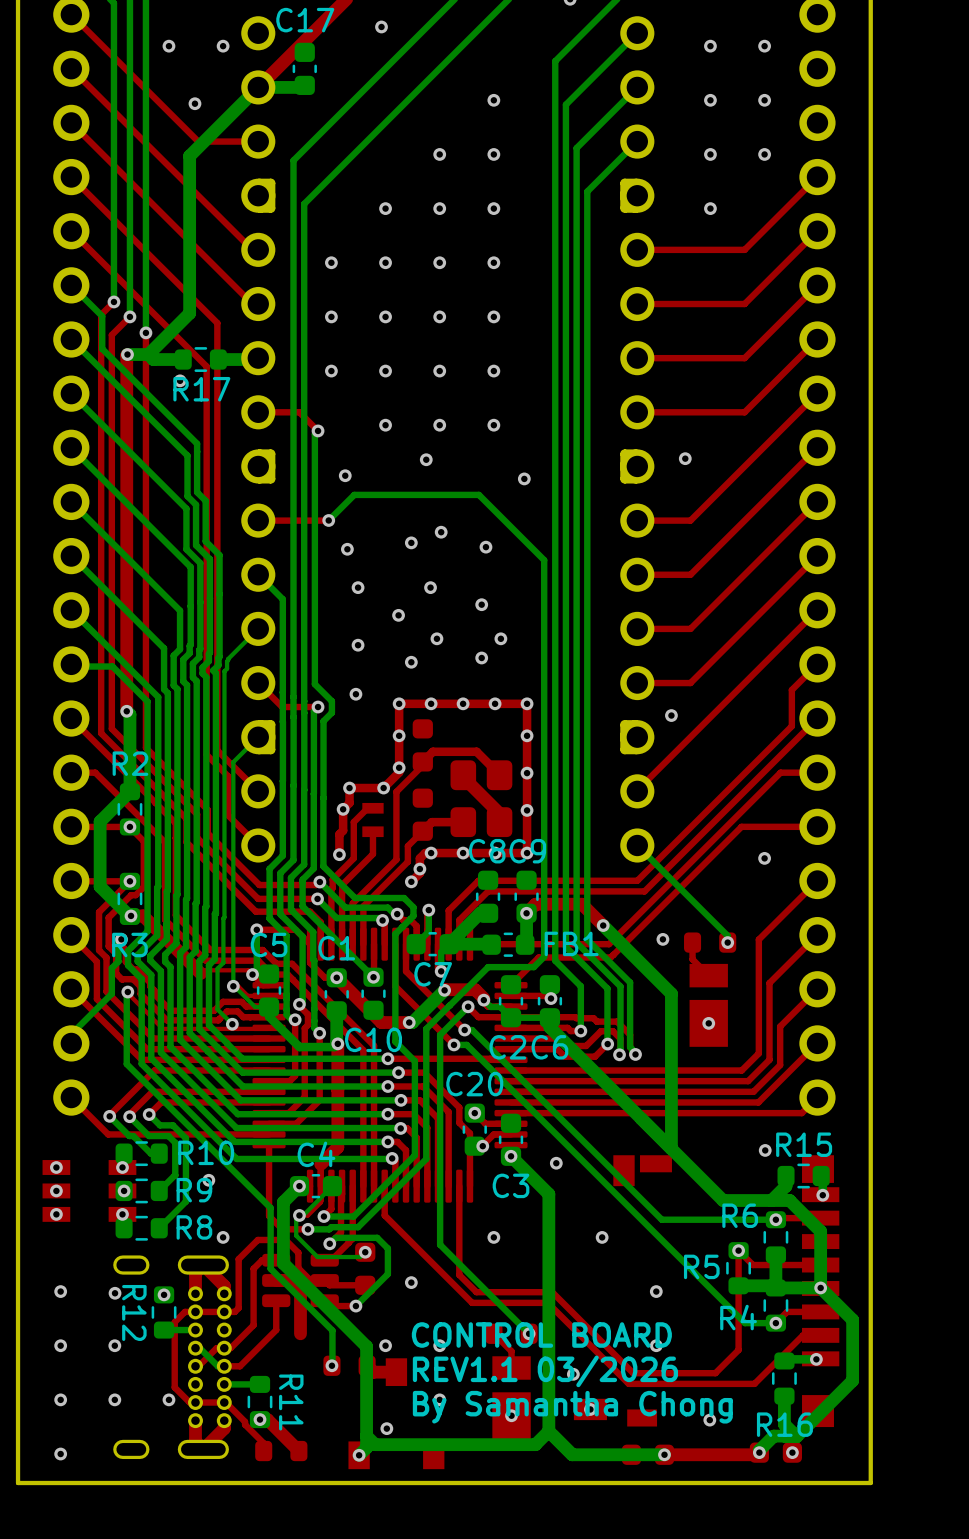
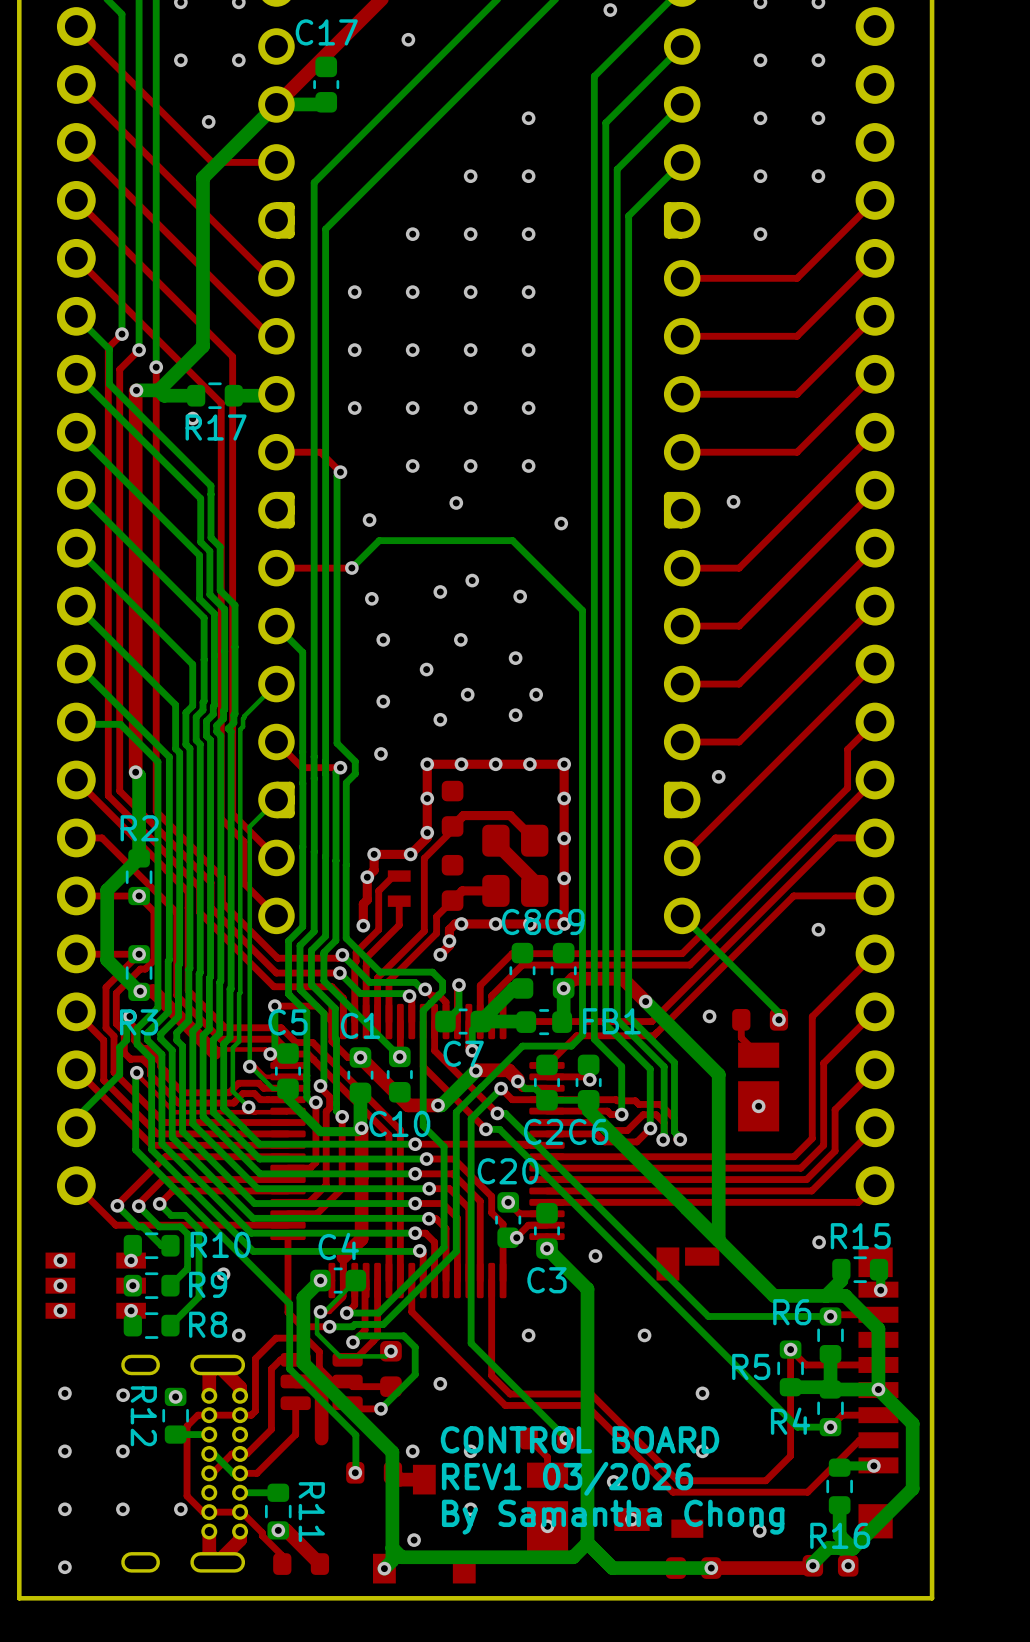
text: REV1.1 03/2026 (545, 1371) -> REV1 03/2026 (567, 1478)

